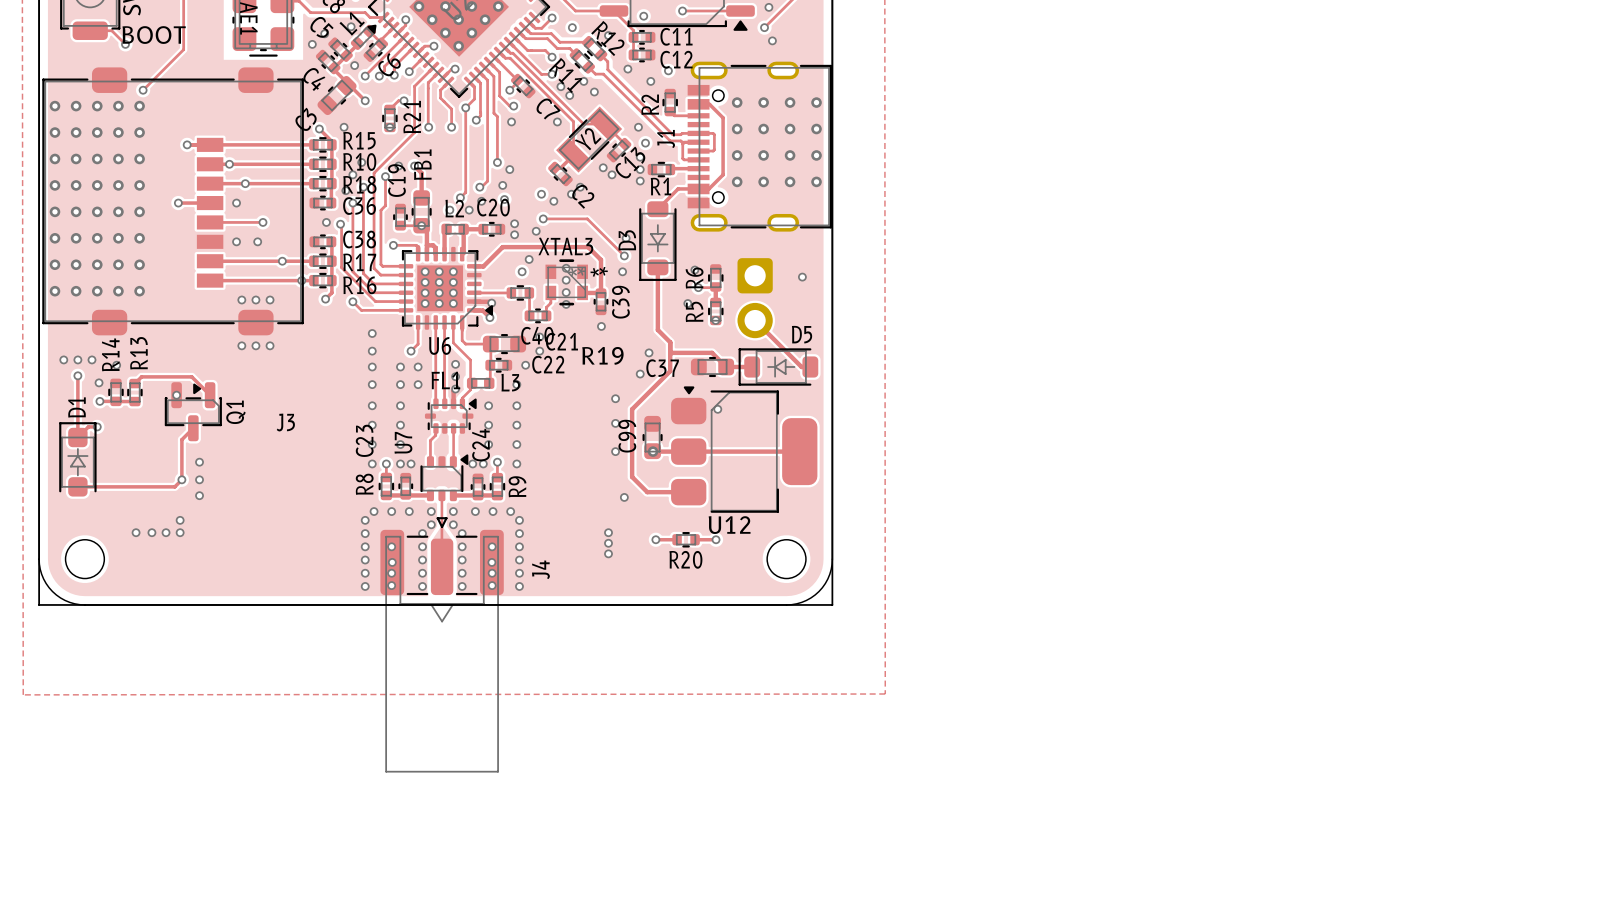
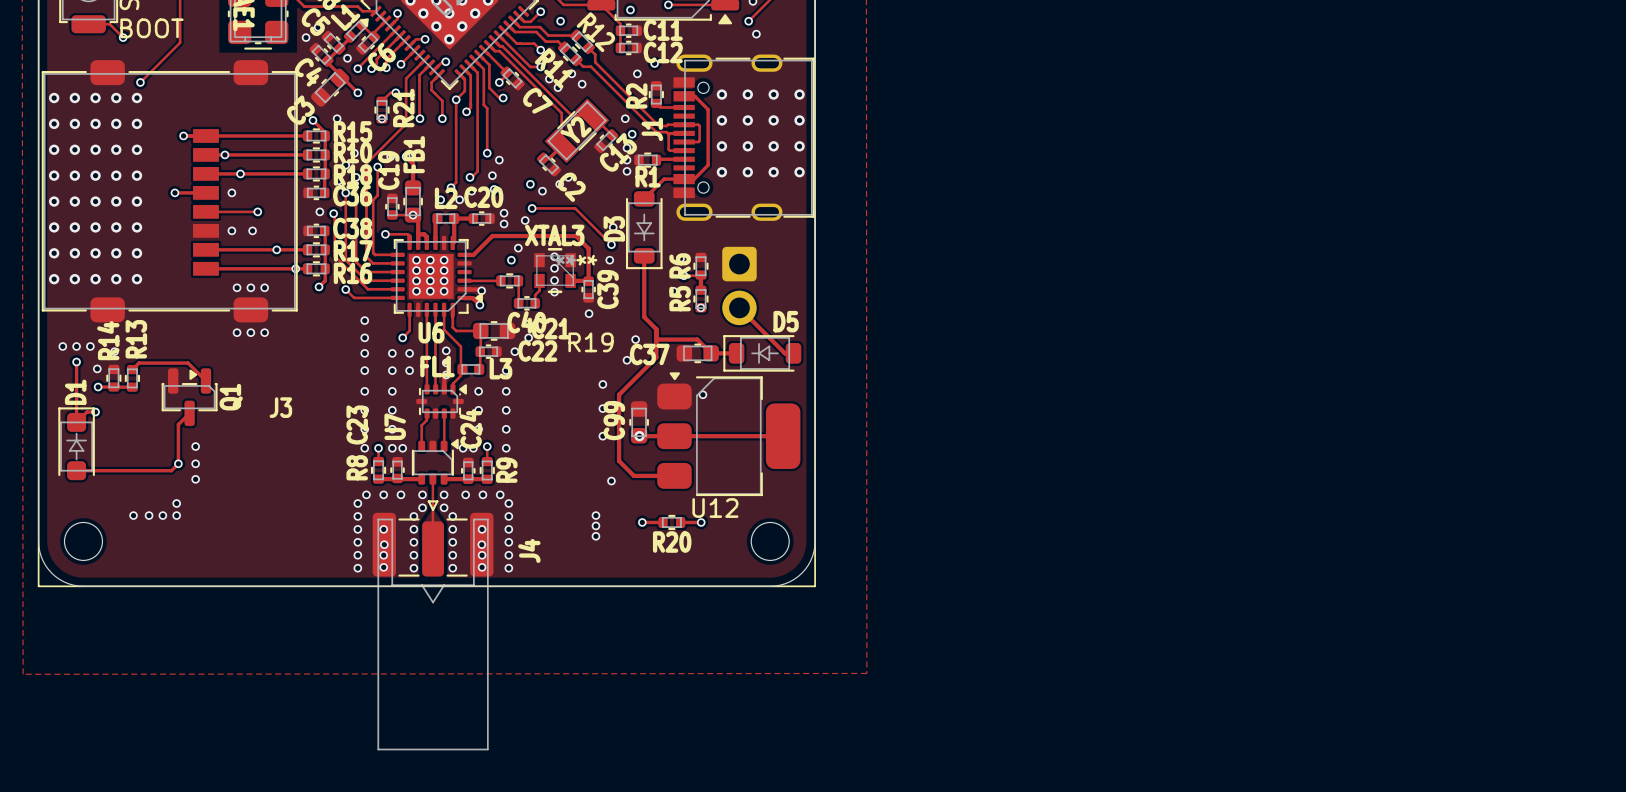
via: (351, 26) -> none
via: (608, 35) -> none
via: (627, 69) -> none
via: (511, 121) -> none
via: (557, 121) -> none
via: (603, 167) -> none
via: (612, 174) -> none
via: (802, 277) -> none
via: (176, 395) -> none

